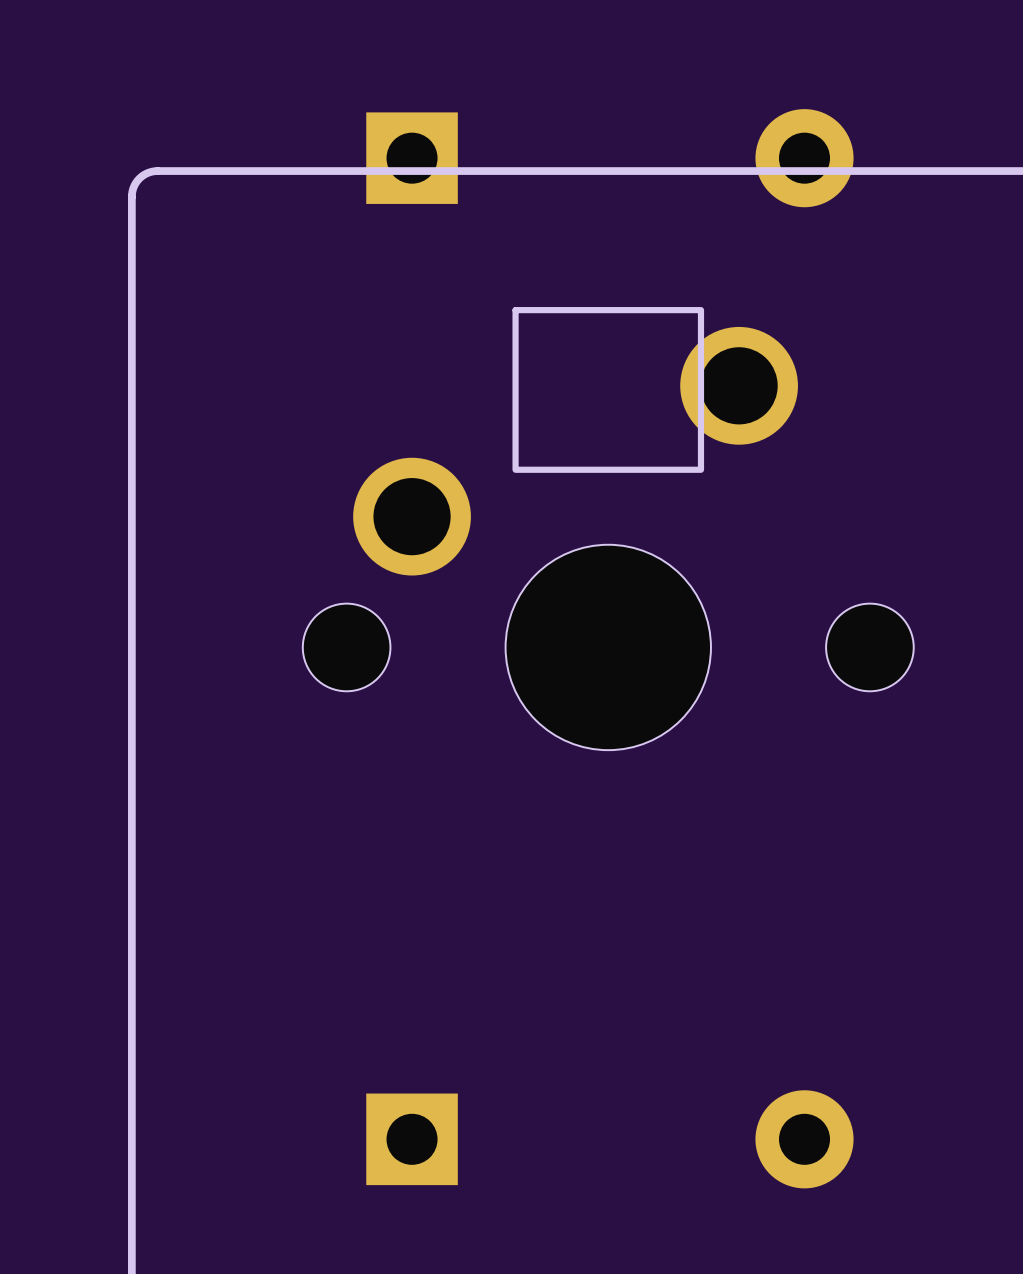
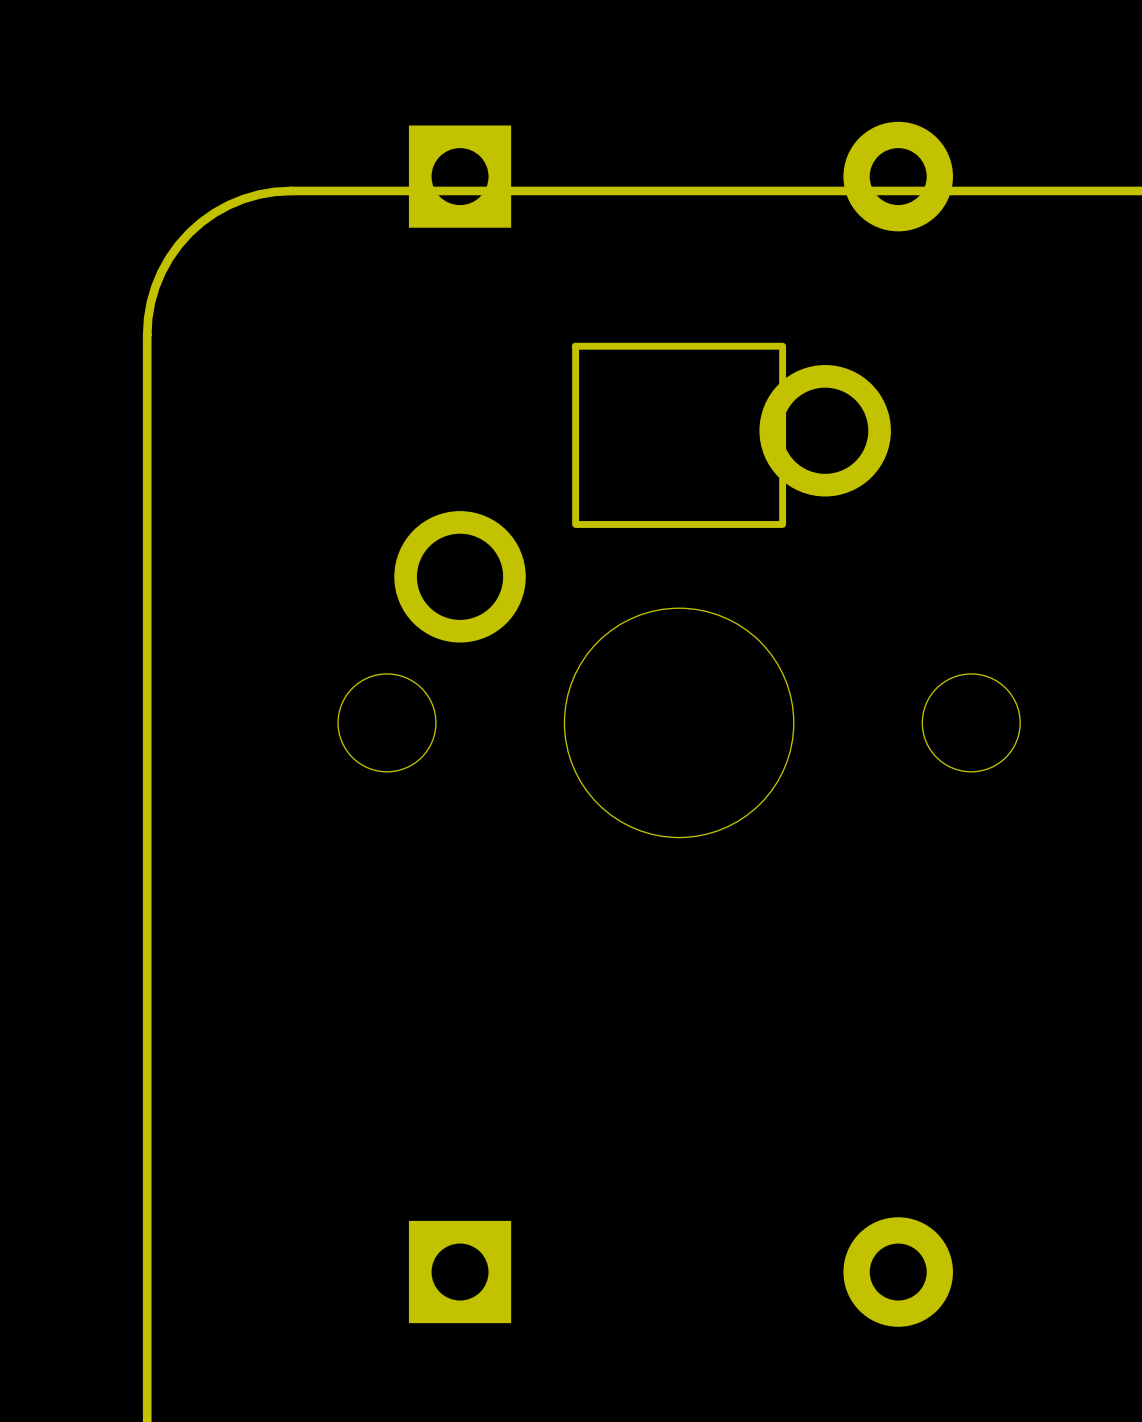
board edge: (260, 171) (154, 171) (139, 178) (132, 193) (131, 299) -> (290, 190) (258, 194) (228, 205) (214, 213) (189, 233) (169, 258) (155, 287) (148, 318) (147, 334)

